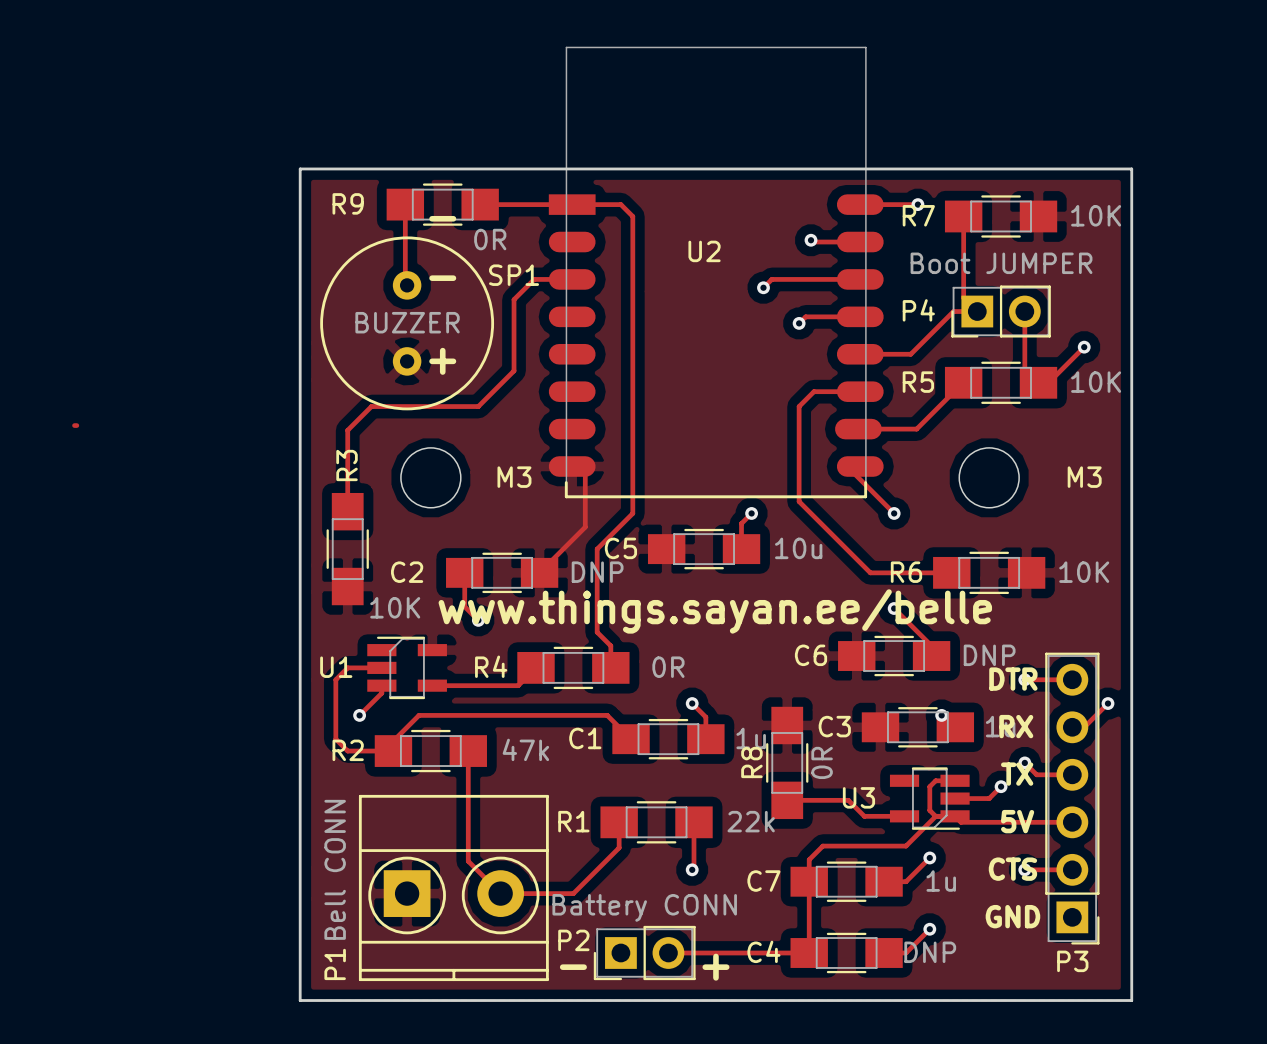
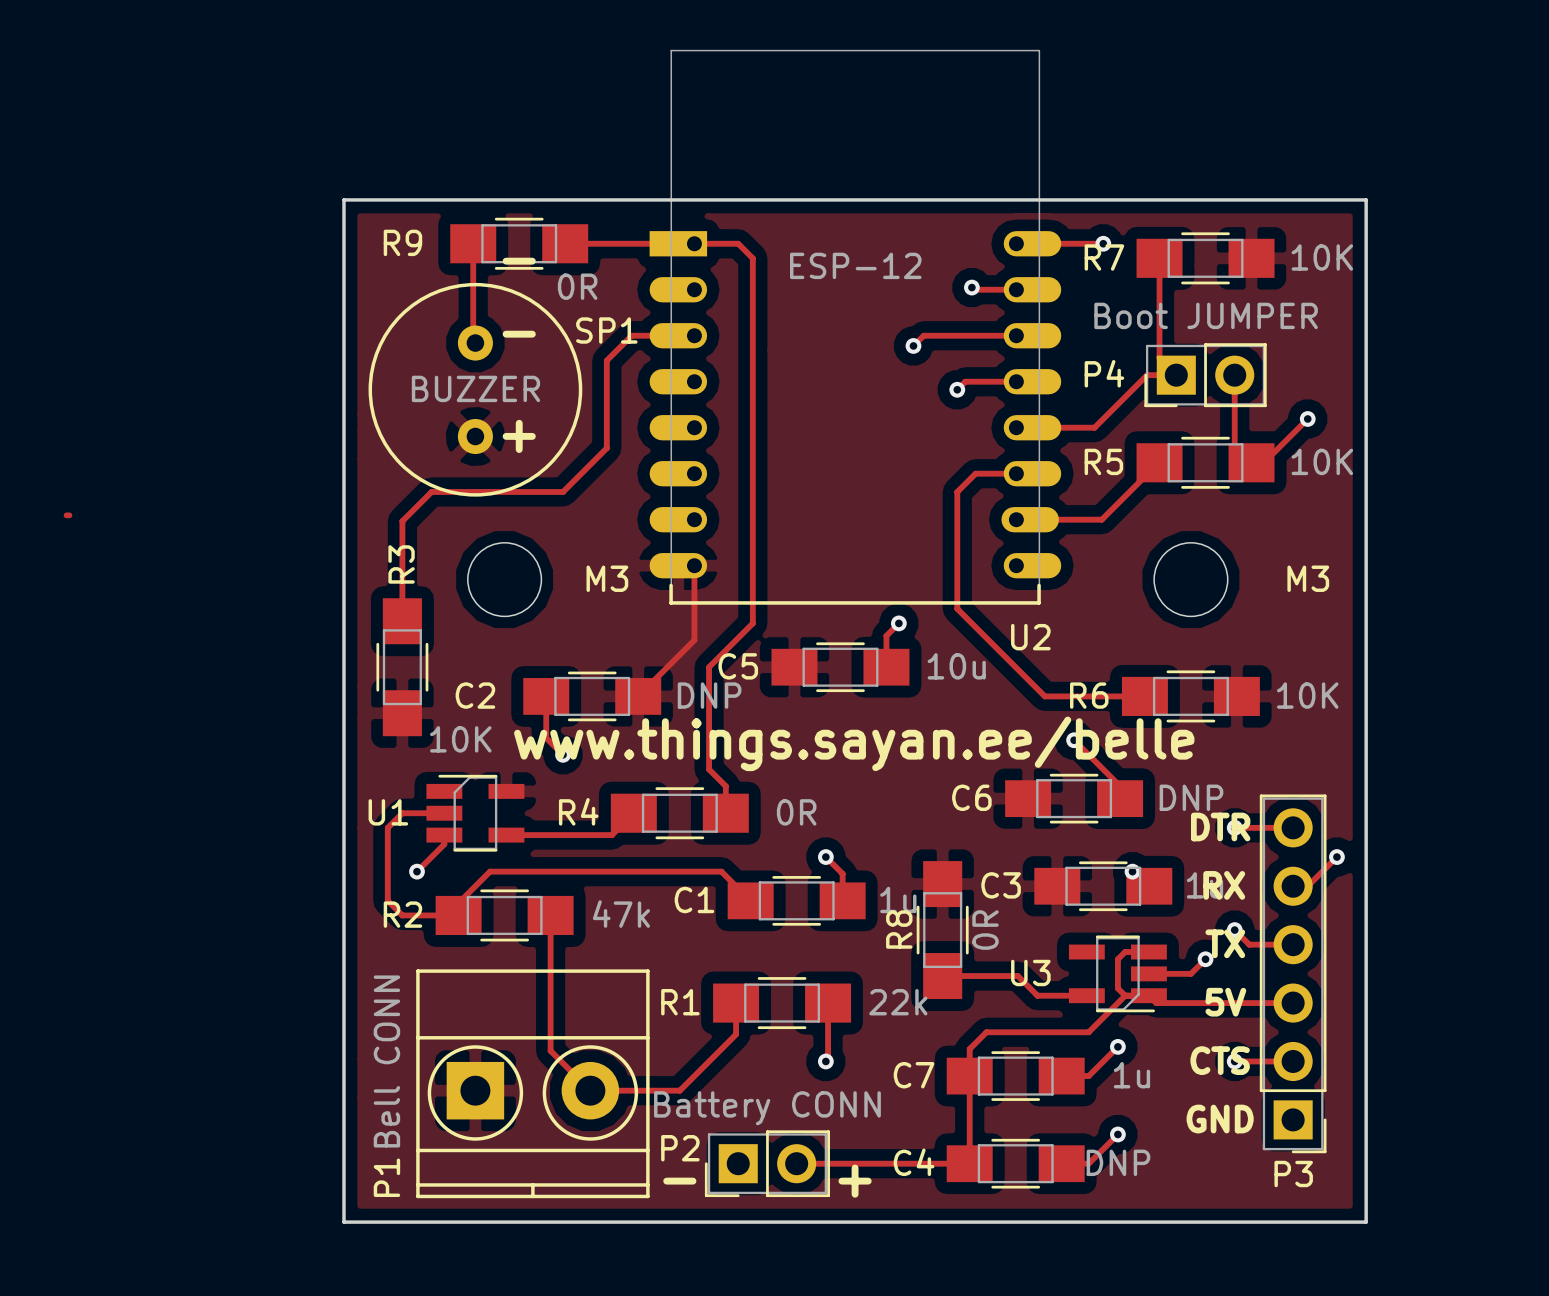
U2 footprint: [548, 46, 884, 499] -> [649, 50, 1062, 605]
U2 value: none -> ESP-12 (855, 265)
U2 name position: U2 (704, 251) -> U2 (1030, 637)
track: (847, 466) (894, 513) -> none
via: (894, 513) -> none

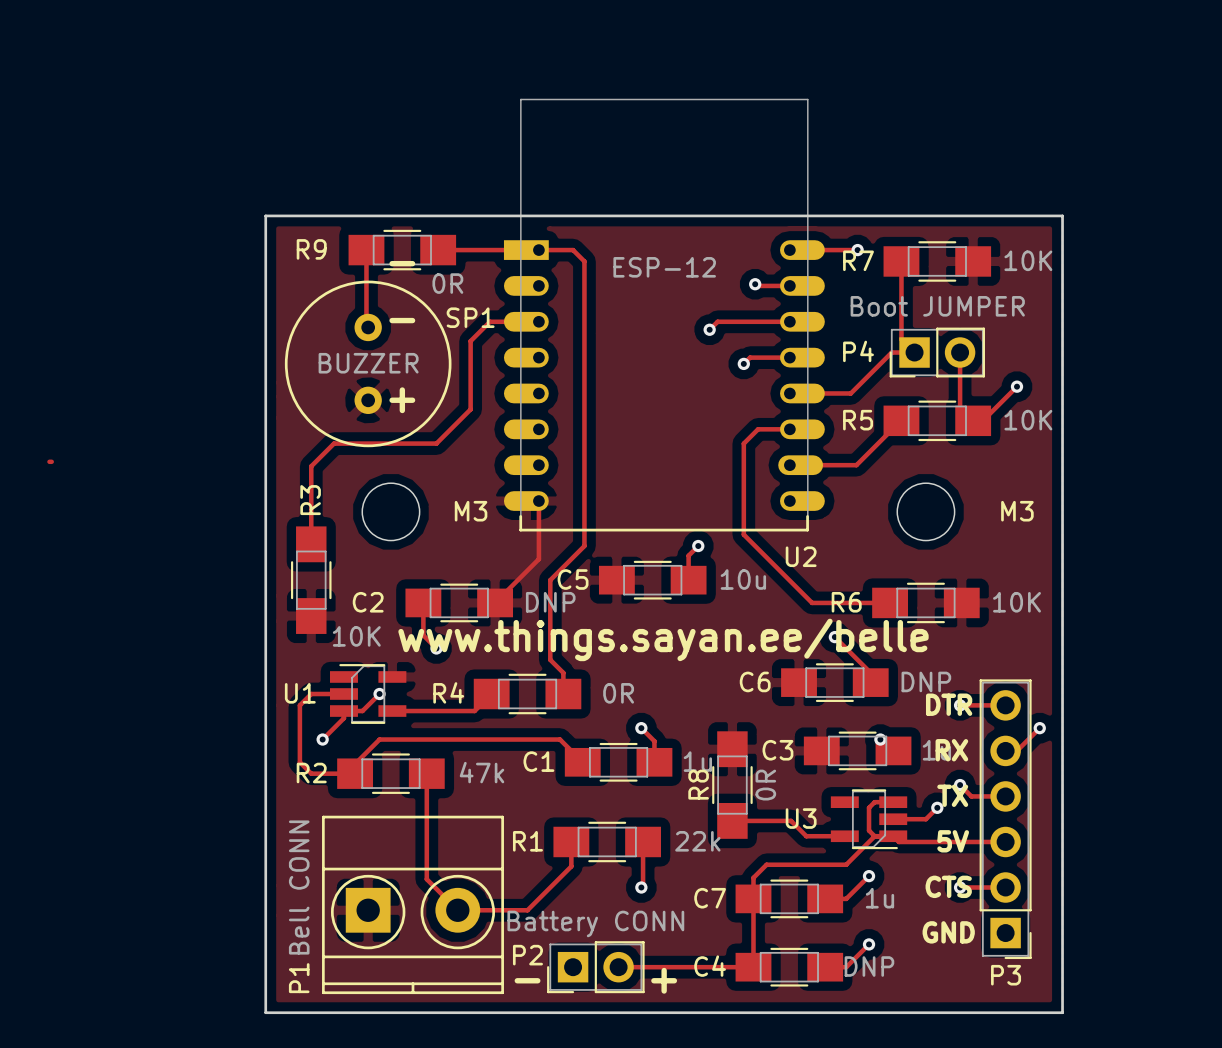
track: none -> (379, 694) (362, 711) (343, 711)
via: none -> (379, 694)

